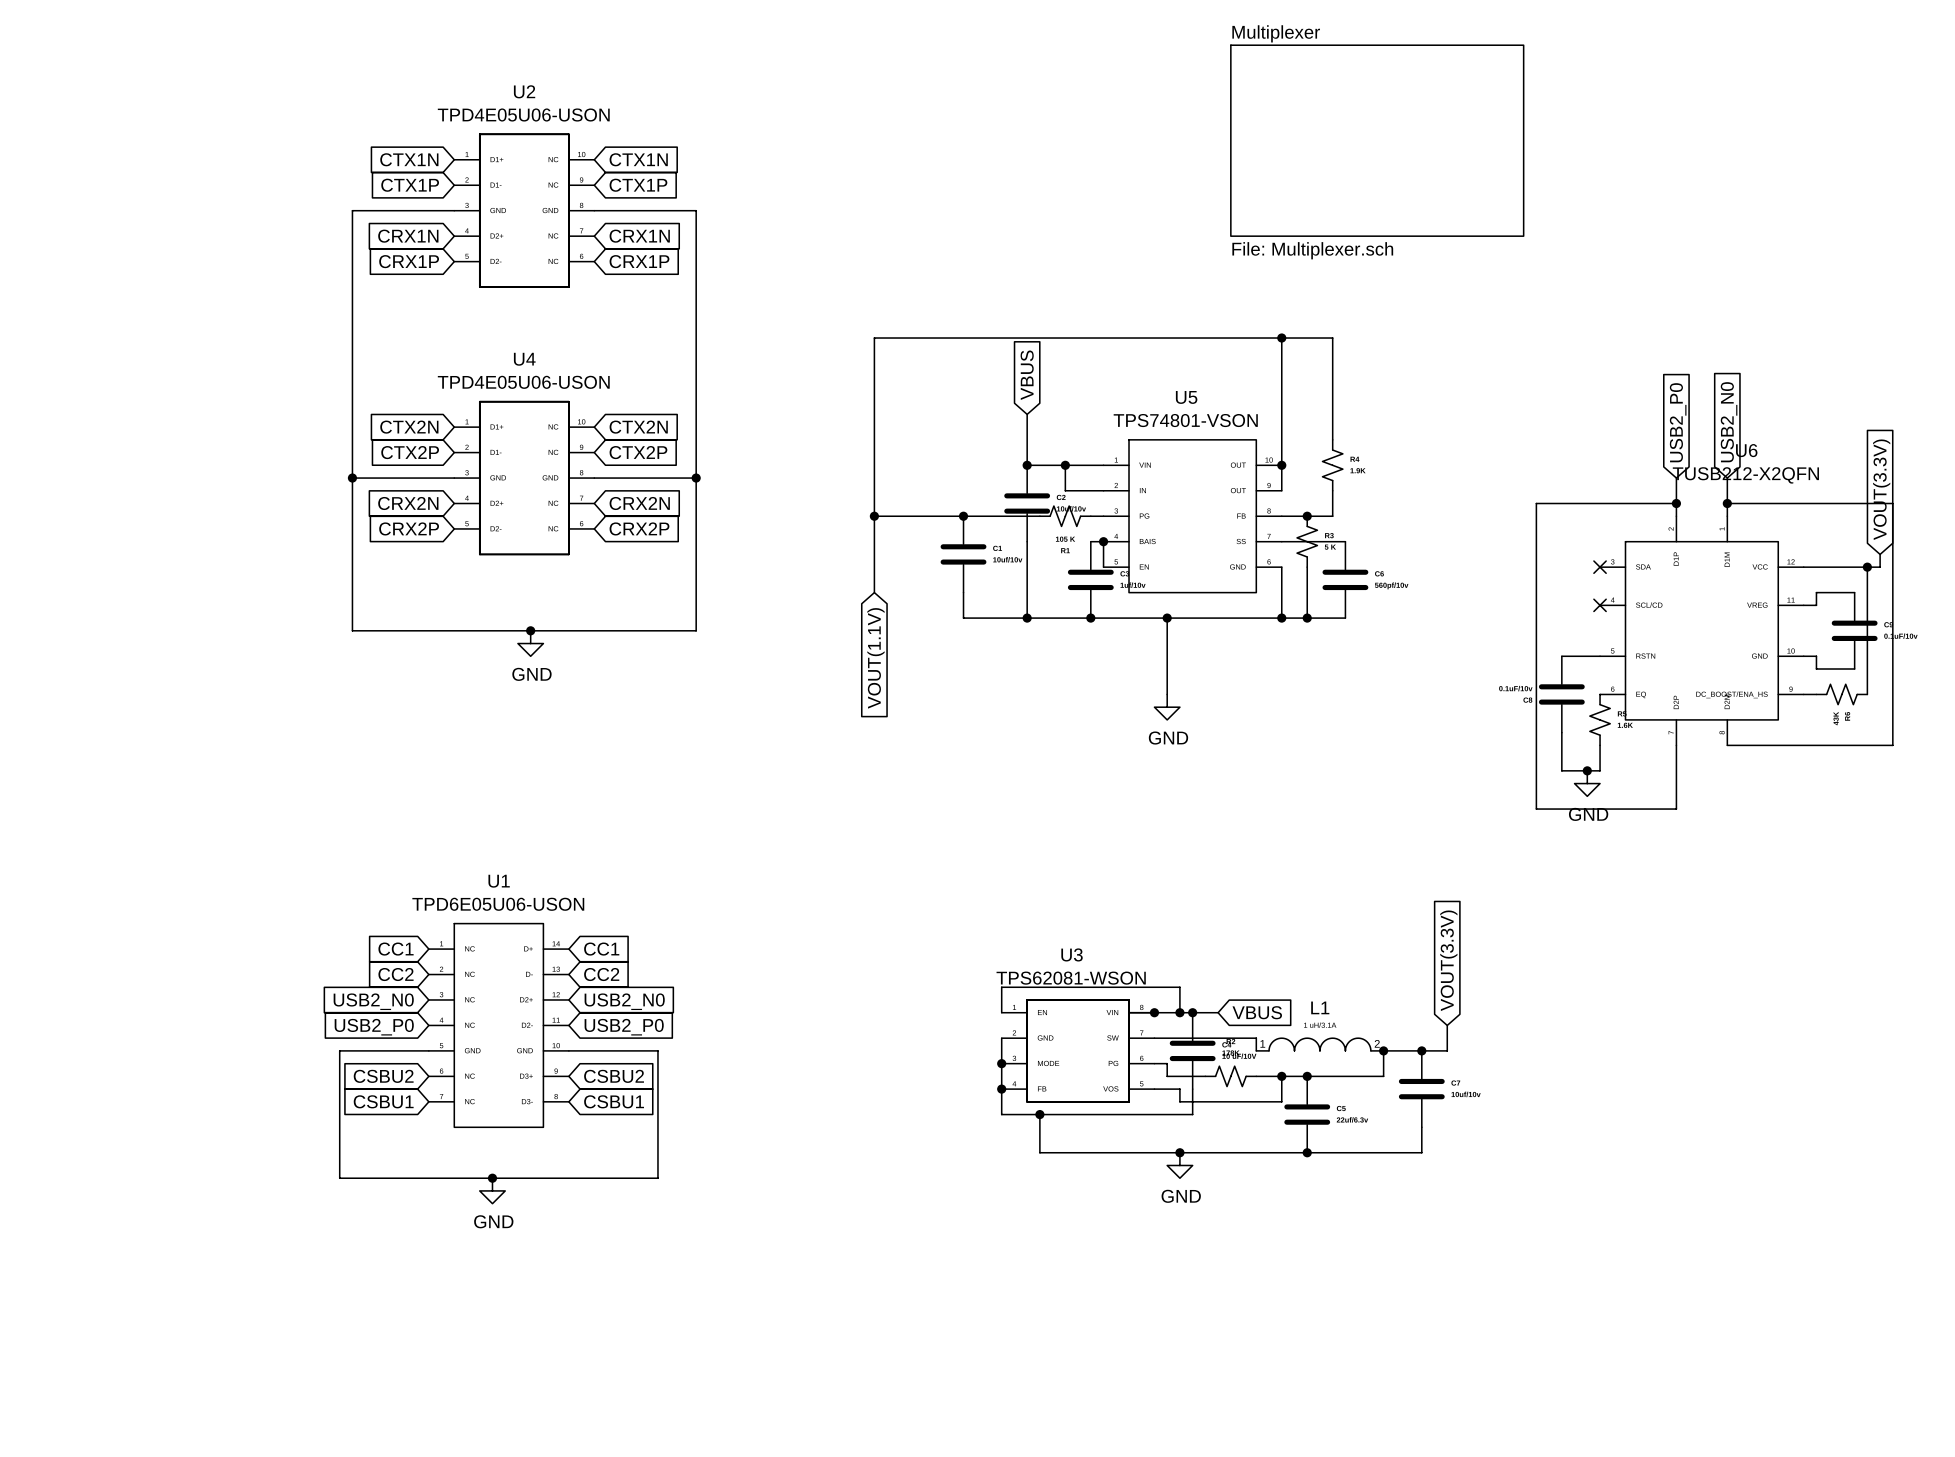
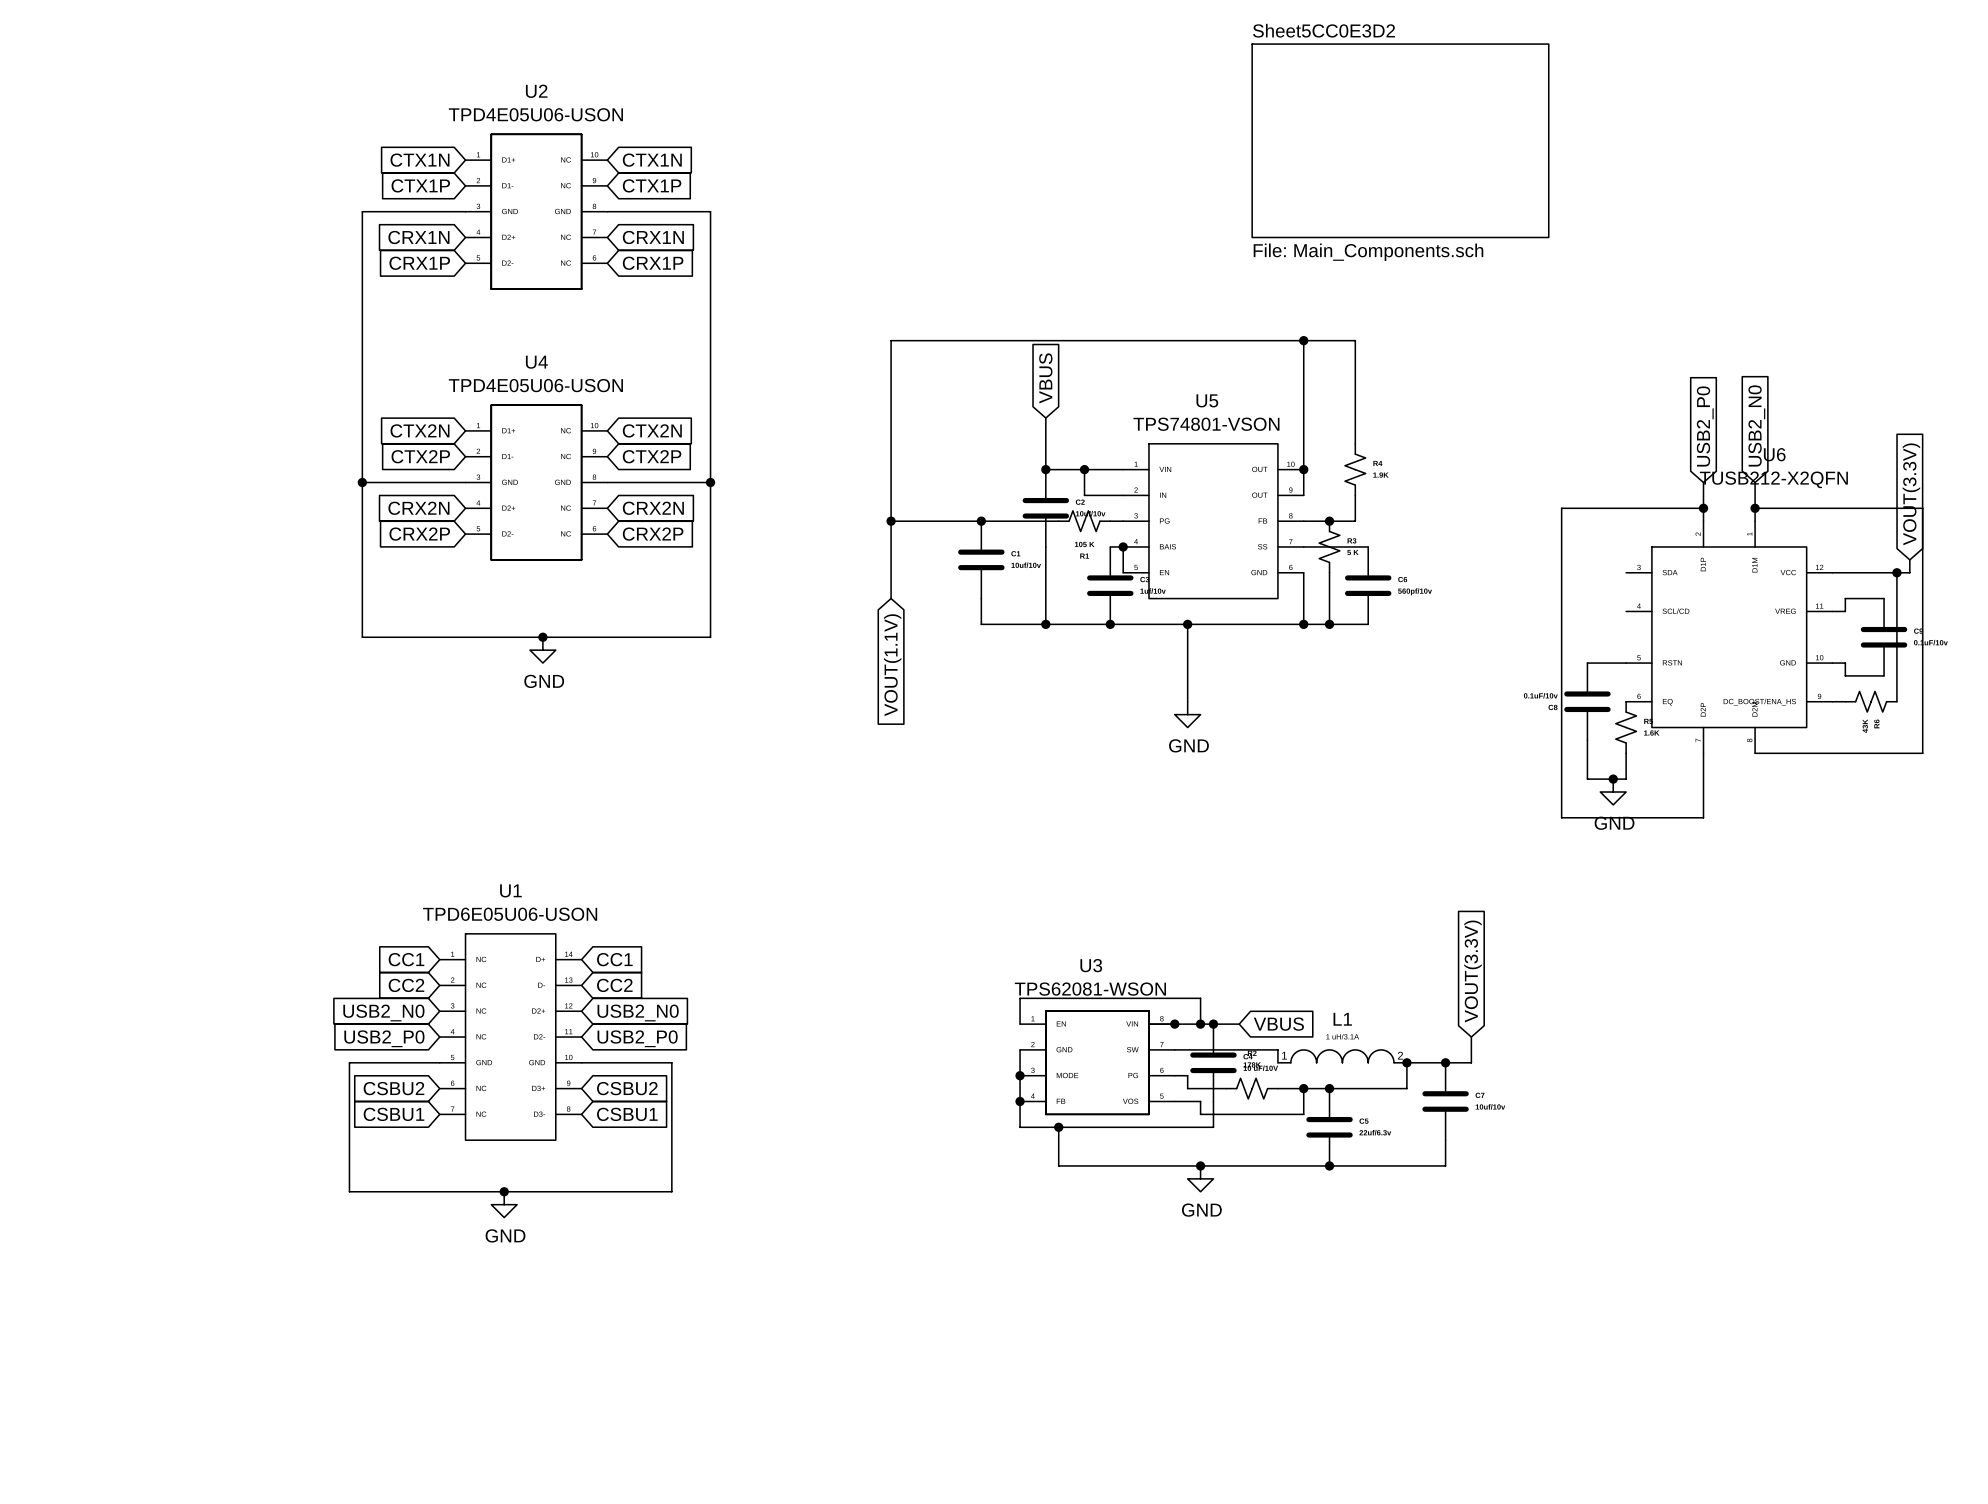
sheet Multiplexer name: Multiplexer (1276, 33) -> Sheet5CC0E3D2 (1324, 30)
sheet Multiplexer value: File: Multiplexer.sch (1312, 250) -> File: Main_Components.sch (1368, 252)
no-connect mark: (1600, 567) -> none
no-connect mark: (1600, 605) -> none

